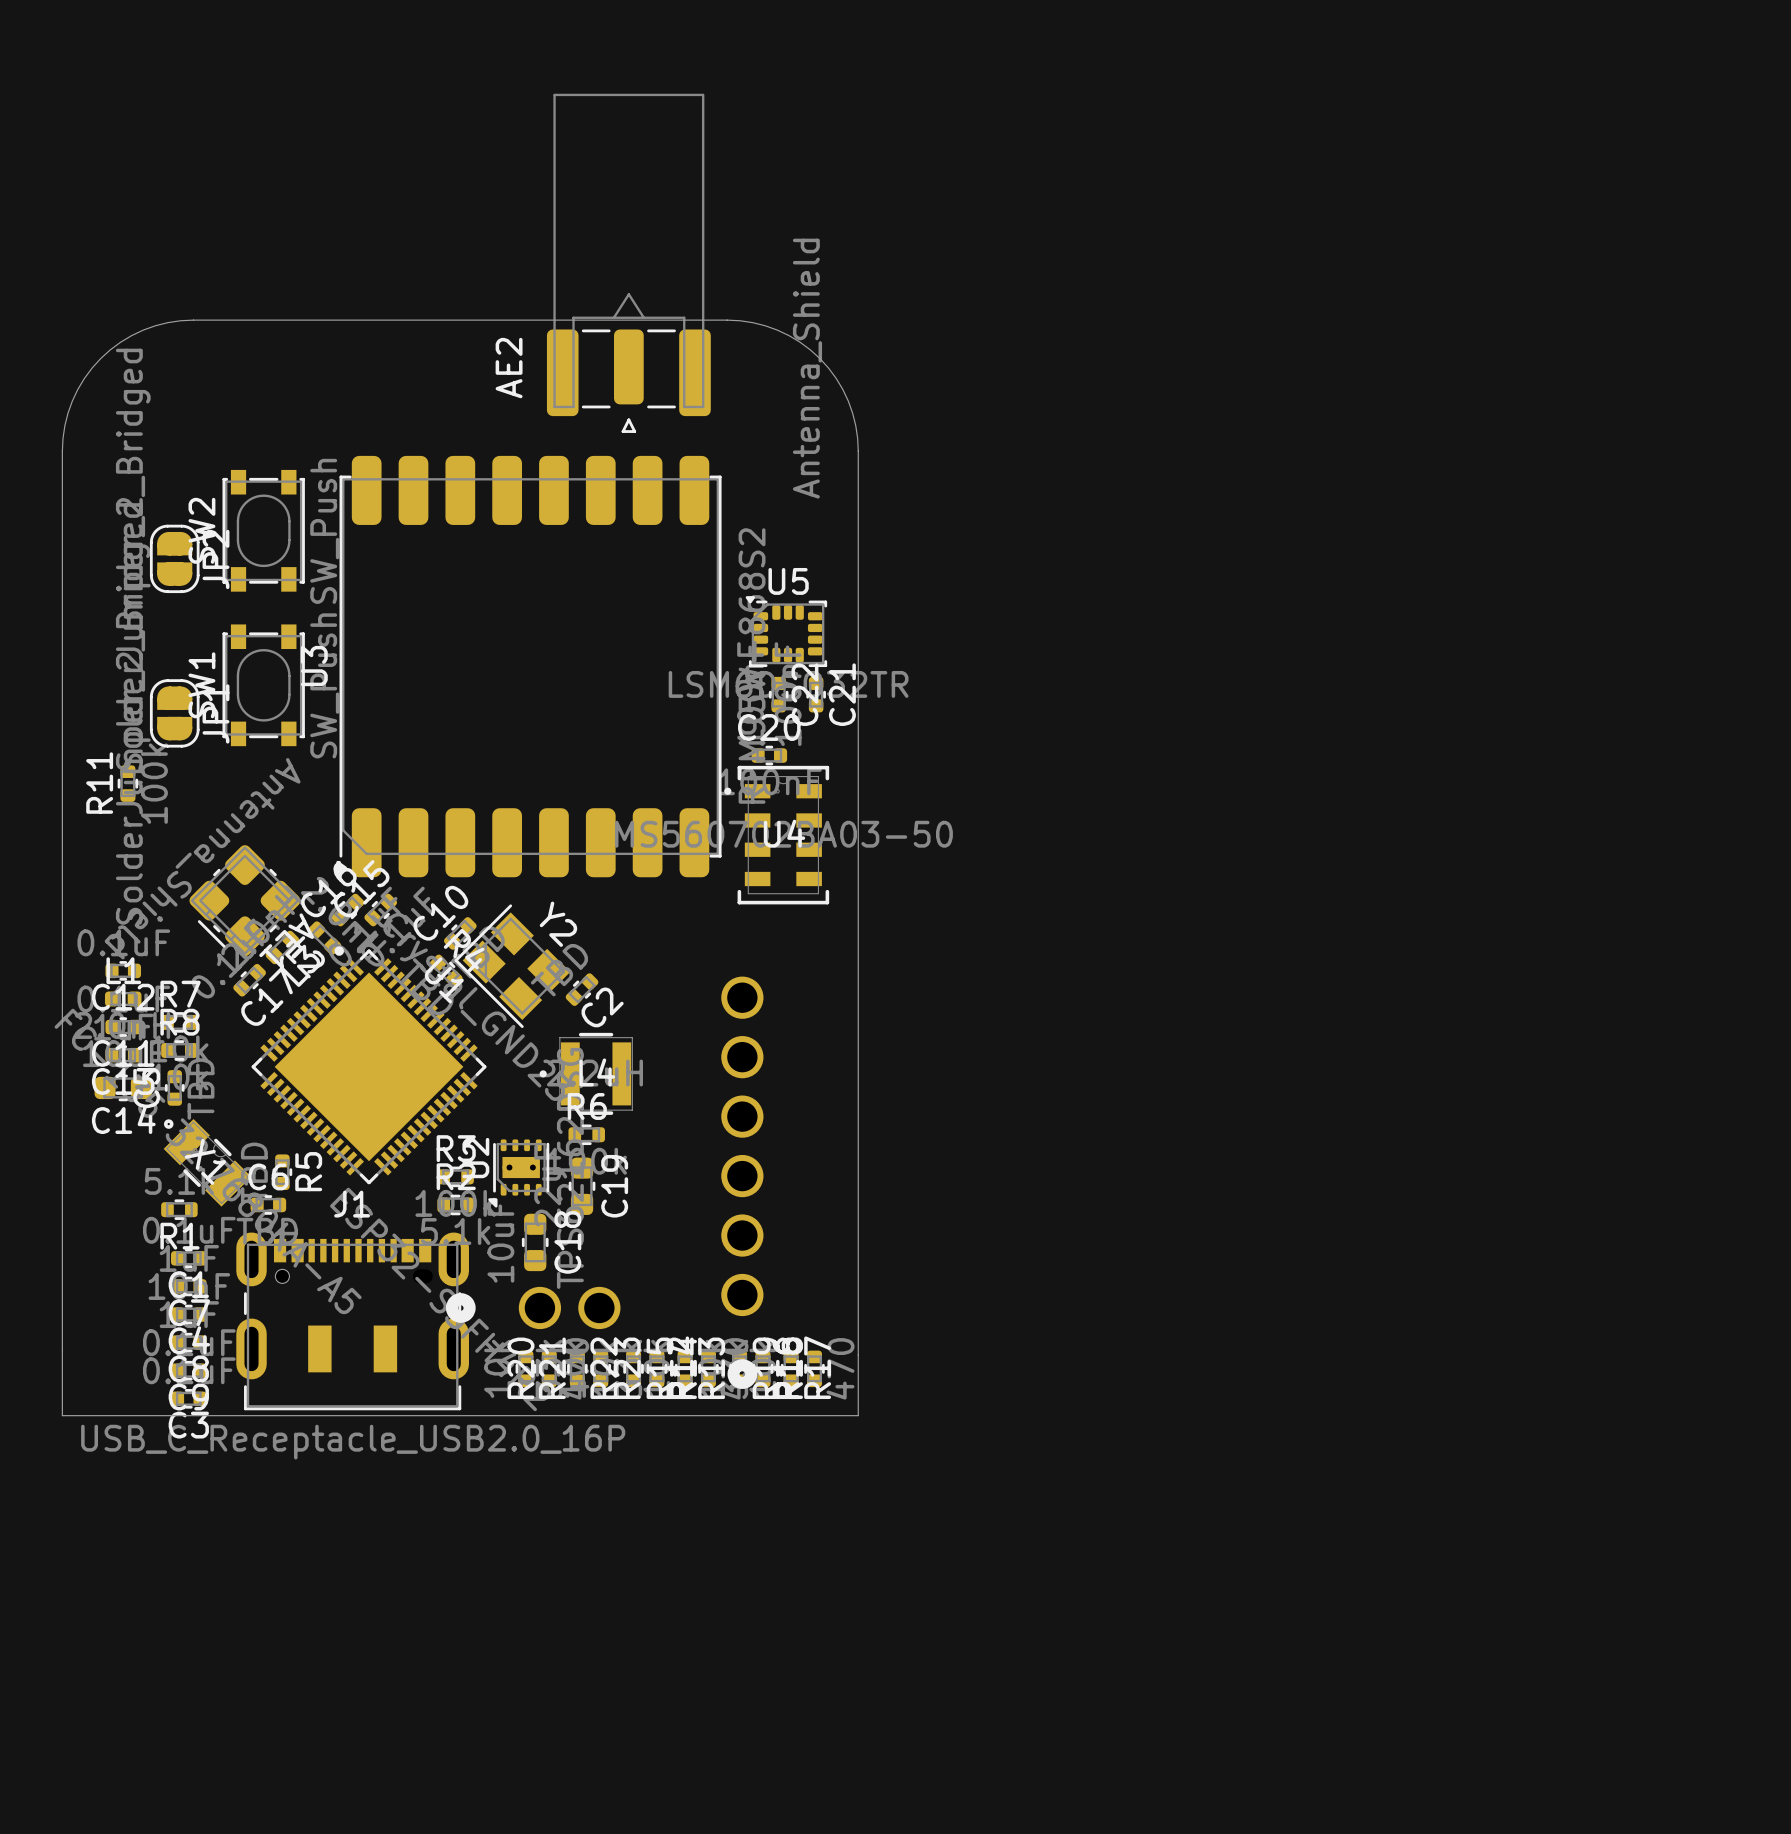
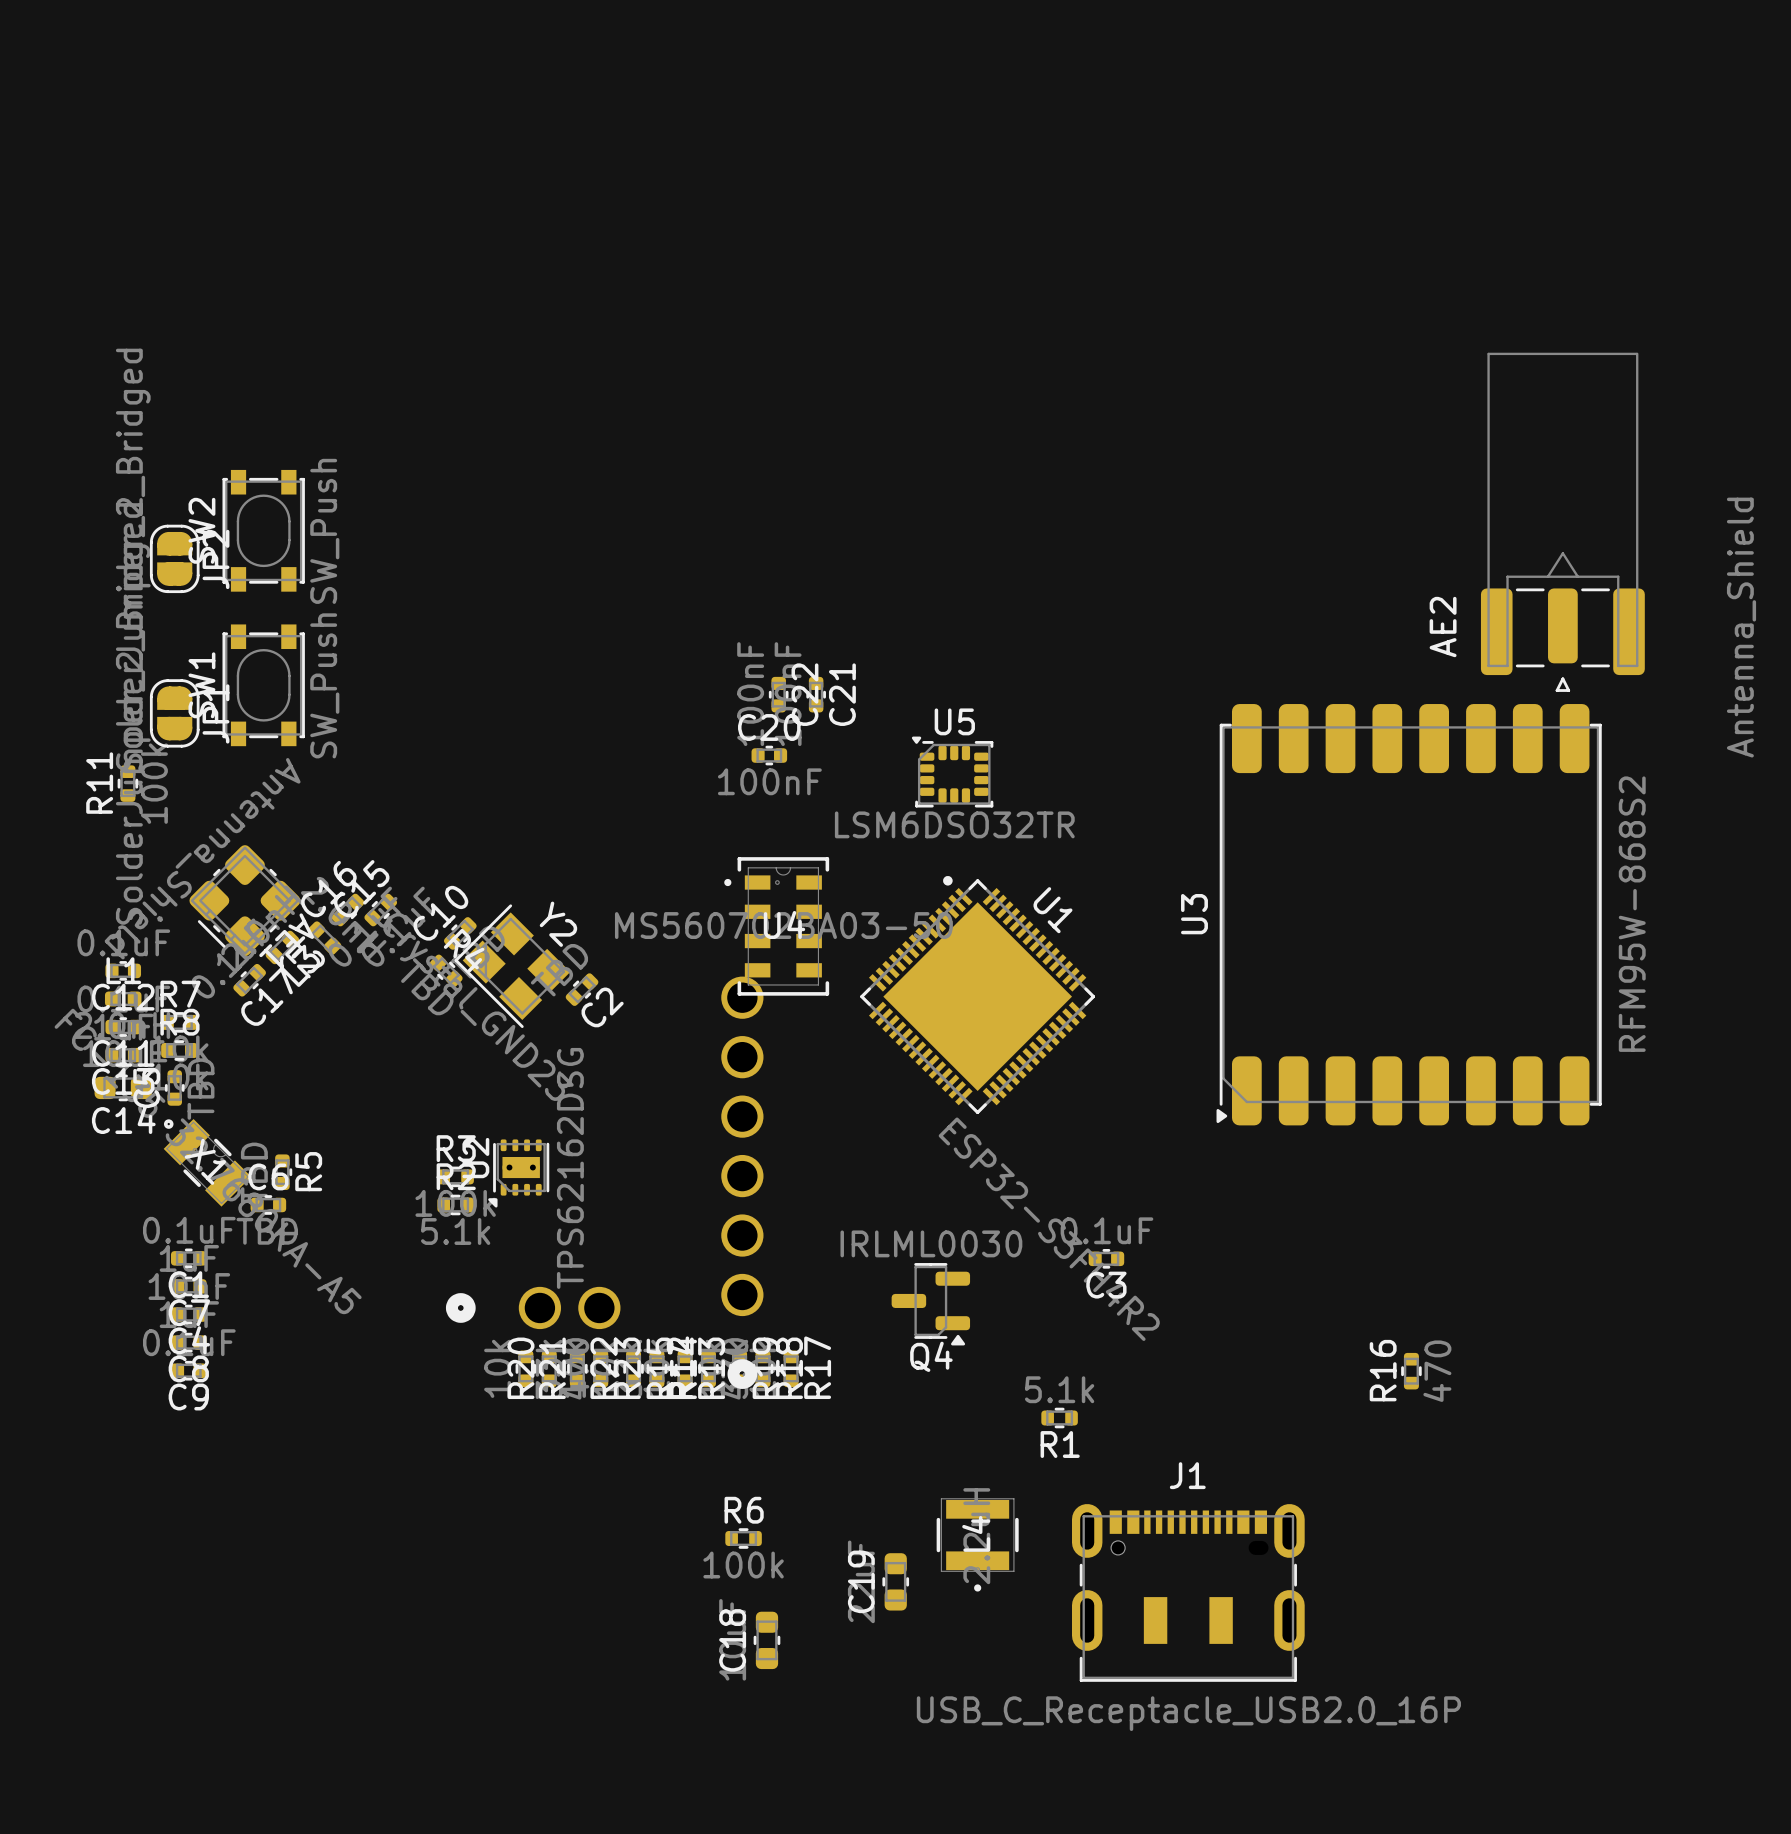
AE2 position: (628, 263) -> (1562, 522)
board edge: (193, 320) (740, 320) (765, 325) (788, 335) (810, 349) (836, 378) (852, 413) (858, 451) (858, 1415) (62, 1415) (63, 438) (68, 413) (77, 389) (92, 368) (110, 349) (131, 335) (155, 325) (193, 320) -> none
U5 position: (786, 631) -> (952, 772)
U3 position: (528, 666) -> (1409, 914)
U4 position: (776, 835) -> (776, 926)
U1 position: (369, 1065) -> (977, 995)
L4 rotation: 0° (586, 1073) -> 90° counterclockwise (977, 1545)
L4 position: (586, 1073) -> (977, 1545)
R6 position: (586, 1134) -> (743, 1538)
C19 position: (582, 1186) -> (895, 1581)
C19 name position: C19 (614, 1186) -> C19 (861, 1581)
R1 position: (179, 1209) -> (1059, 1418)
C18 position: (535, 1242) -> (766, 1640)
C18 name position: C18 (567, 1242) -> C18 (732, 1640)
Q4: none -> IRLML0030 (930, 1304)
J1 position: (352, 1321) -> (1188, 1592)
R16 position: (814, 1368) -> (1411, 1371)
C3 position: (188, 1398) -> (1106, 1258)

